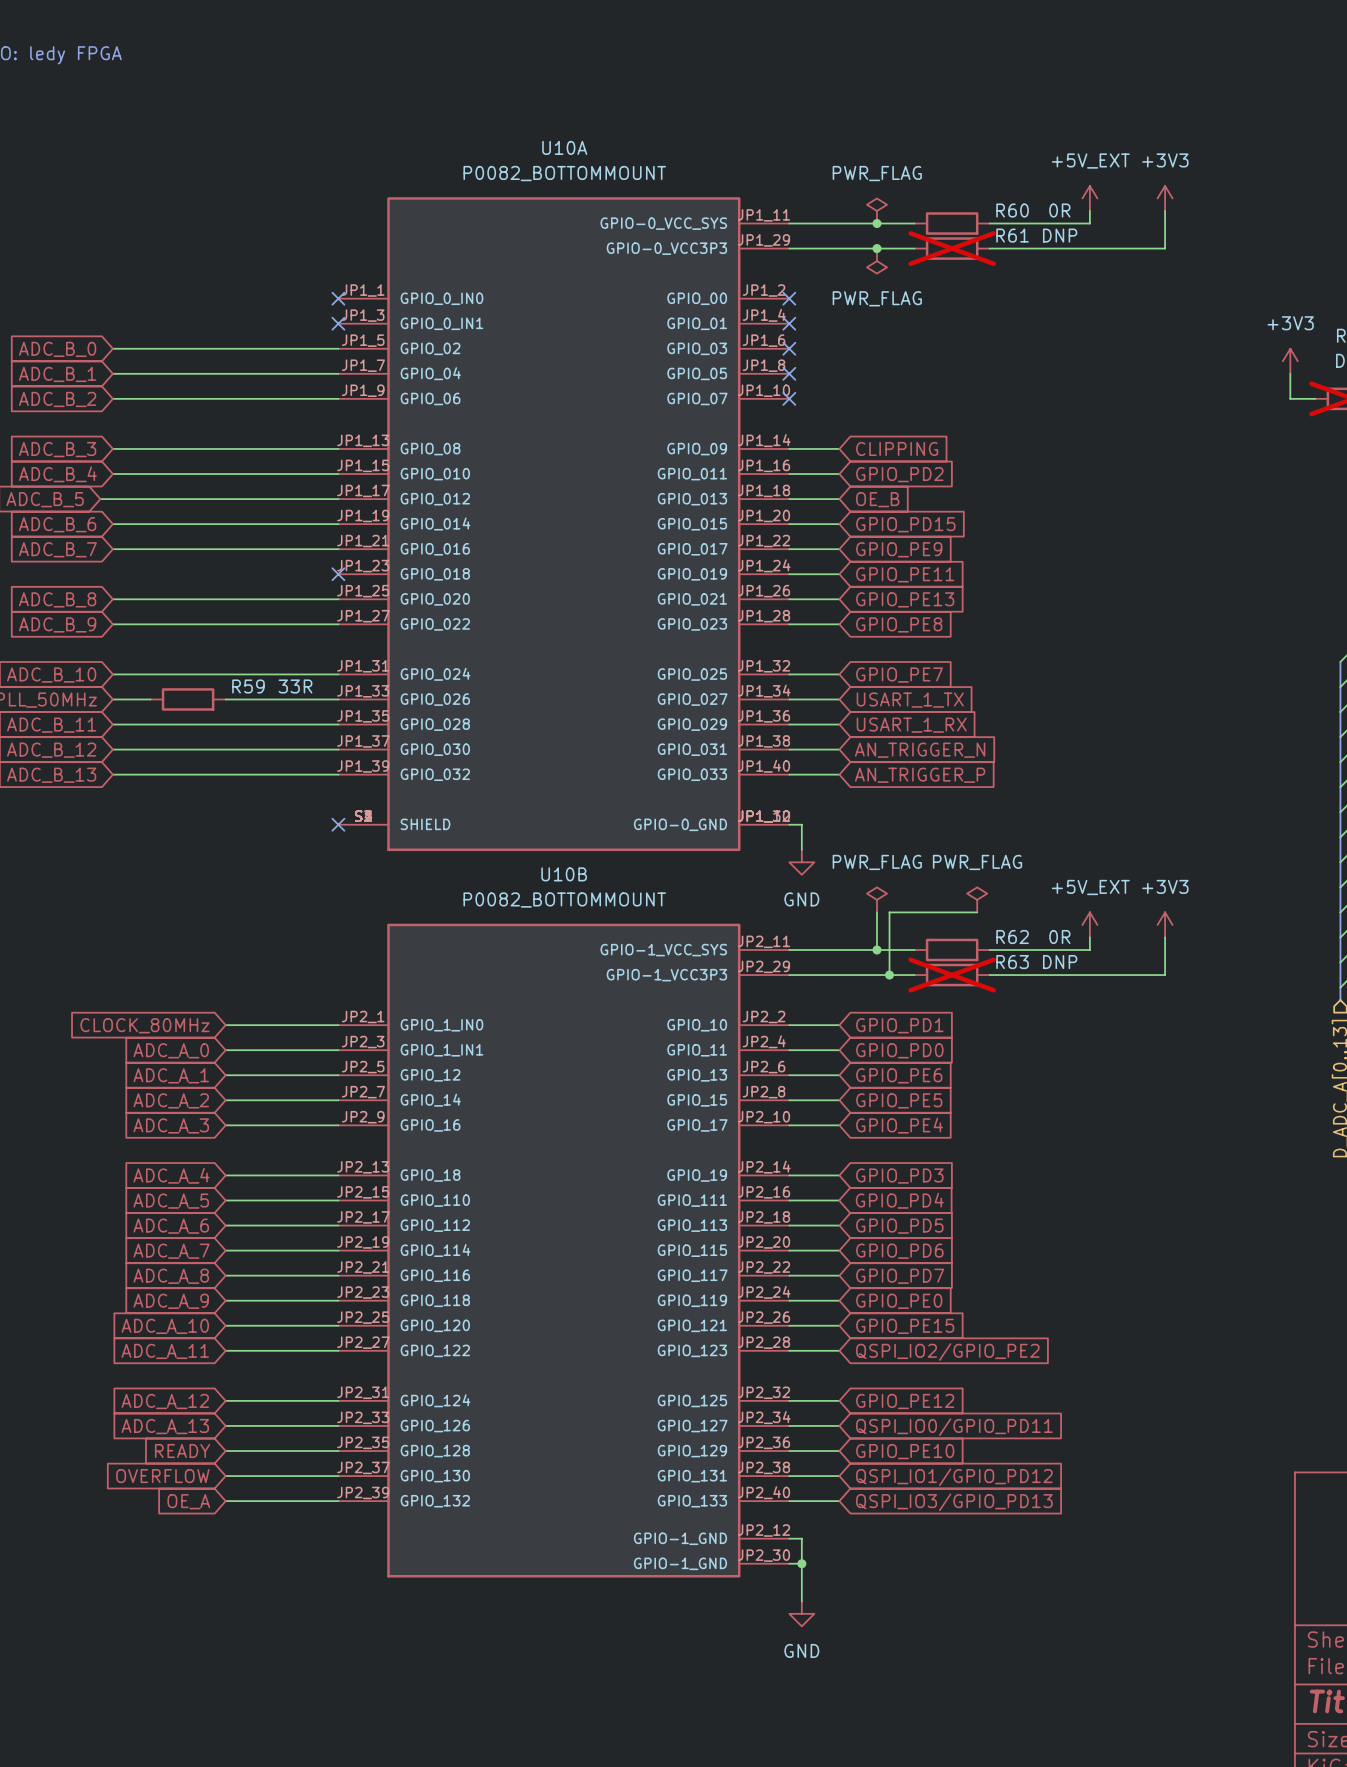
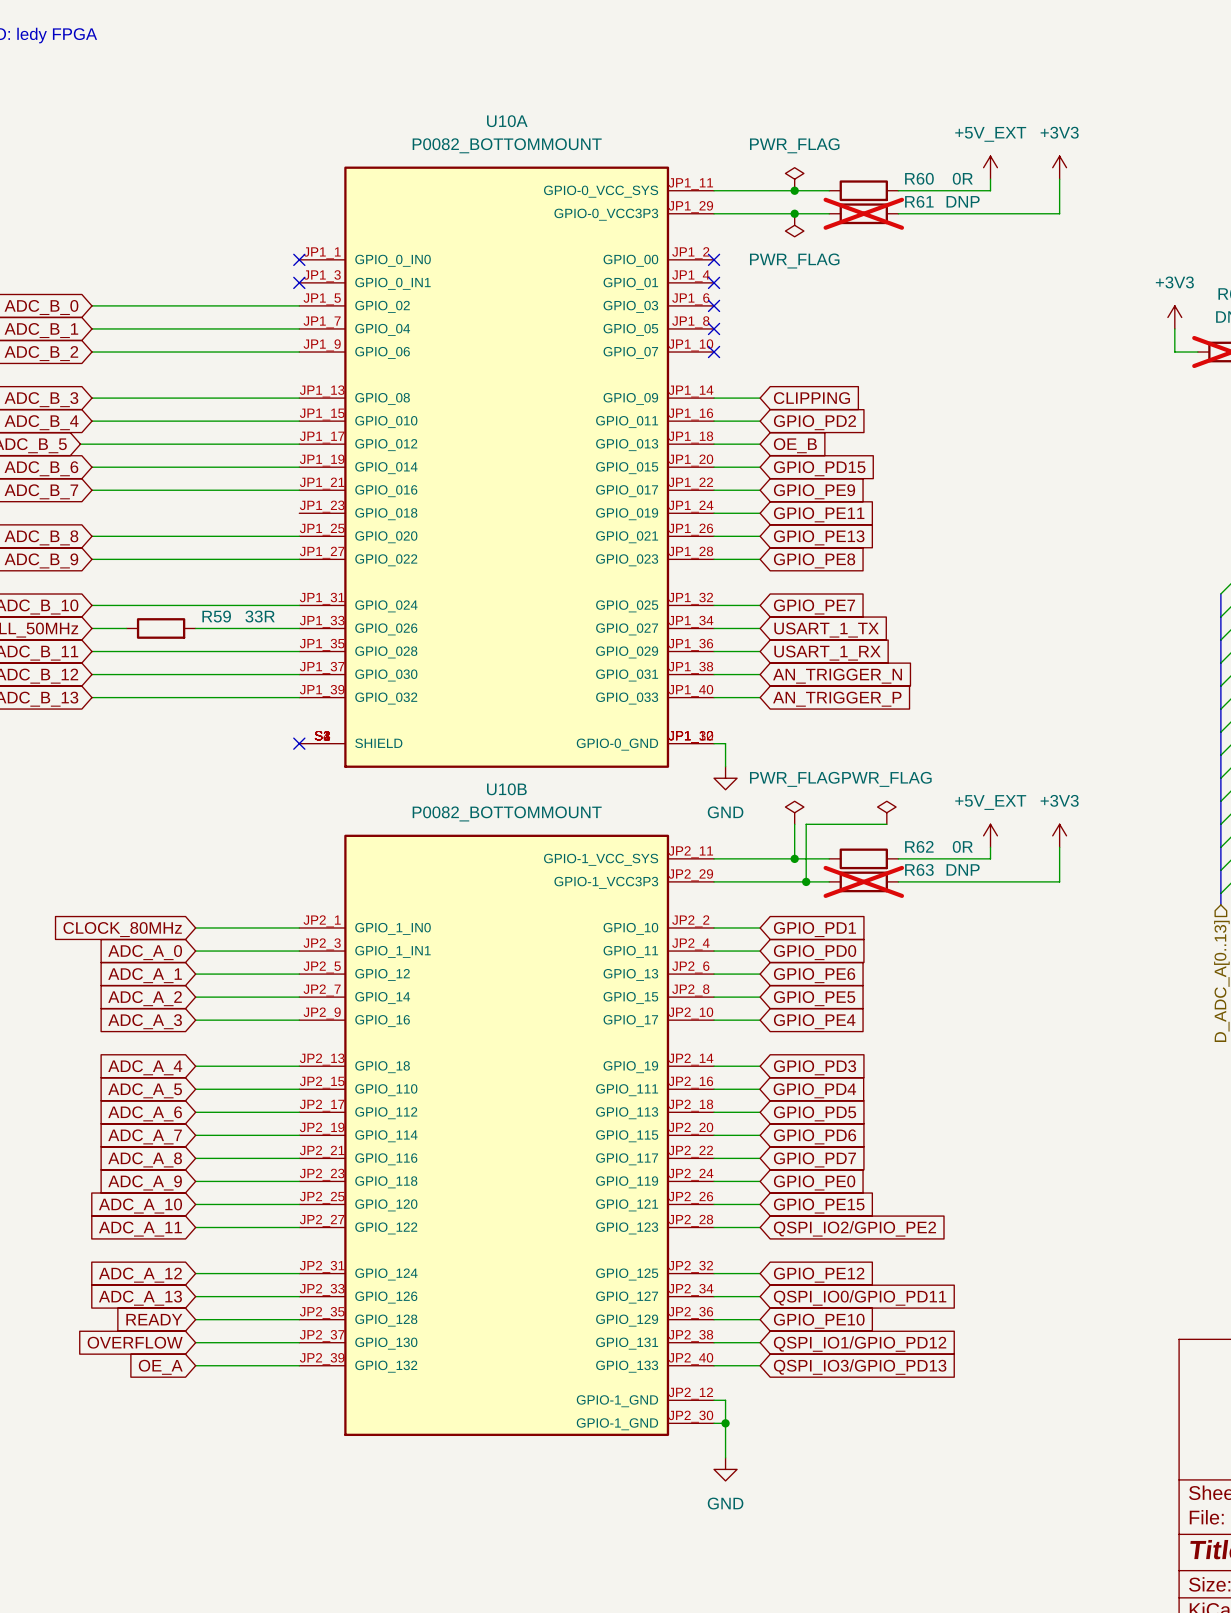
no-connect mark: (338, 574) -> none

